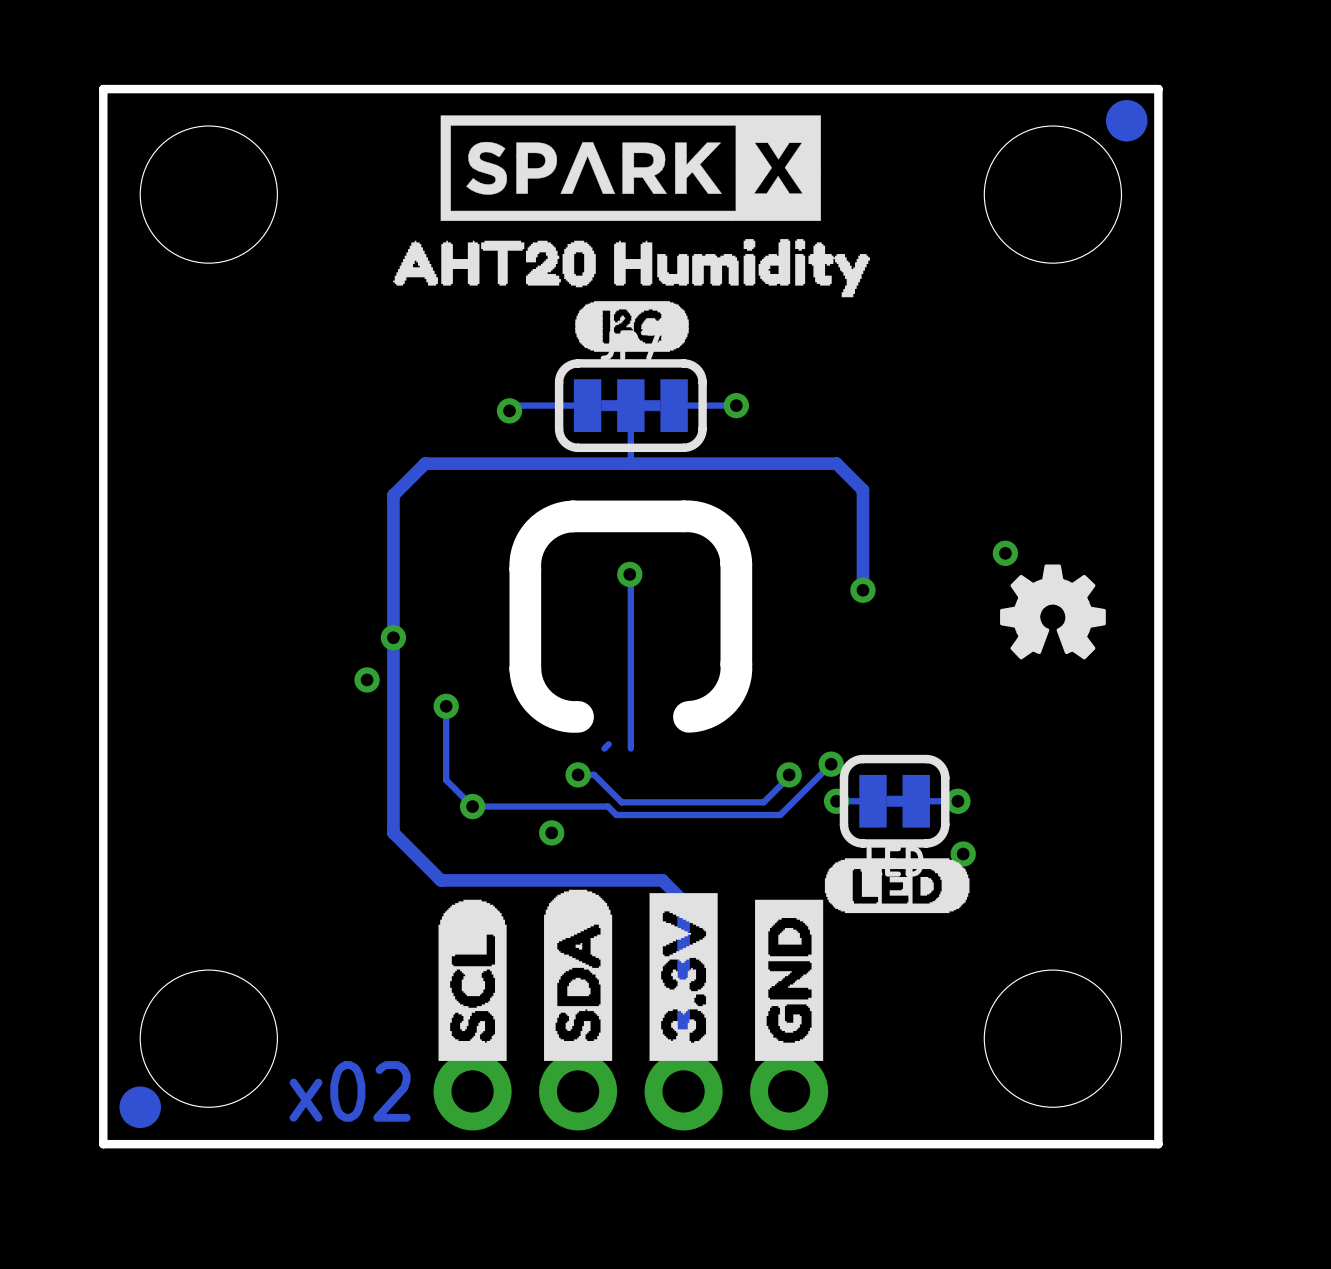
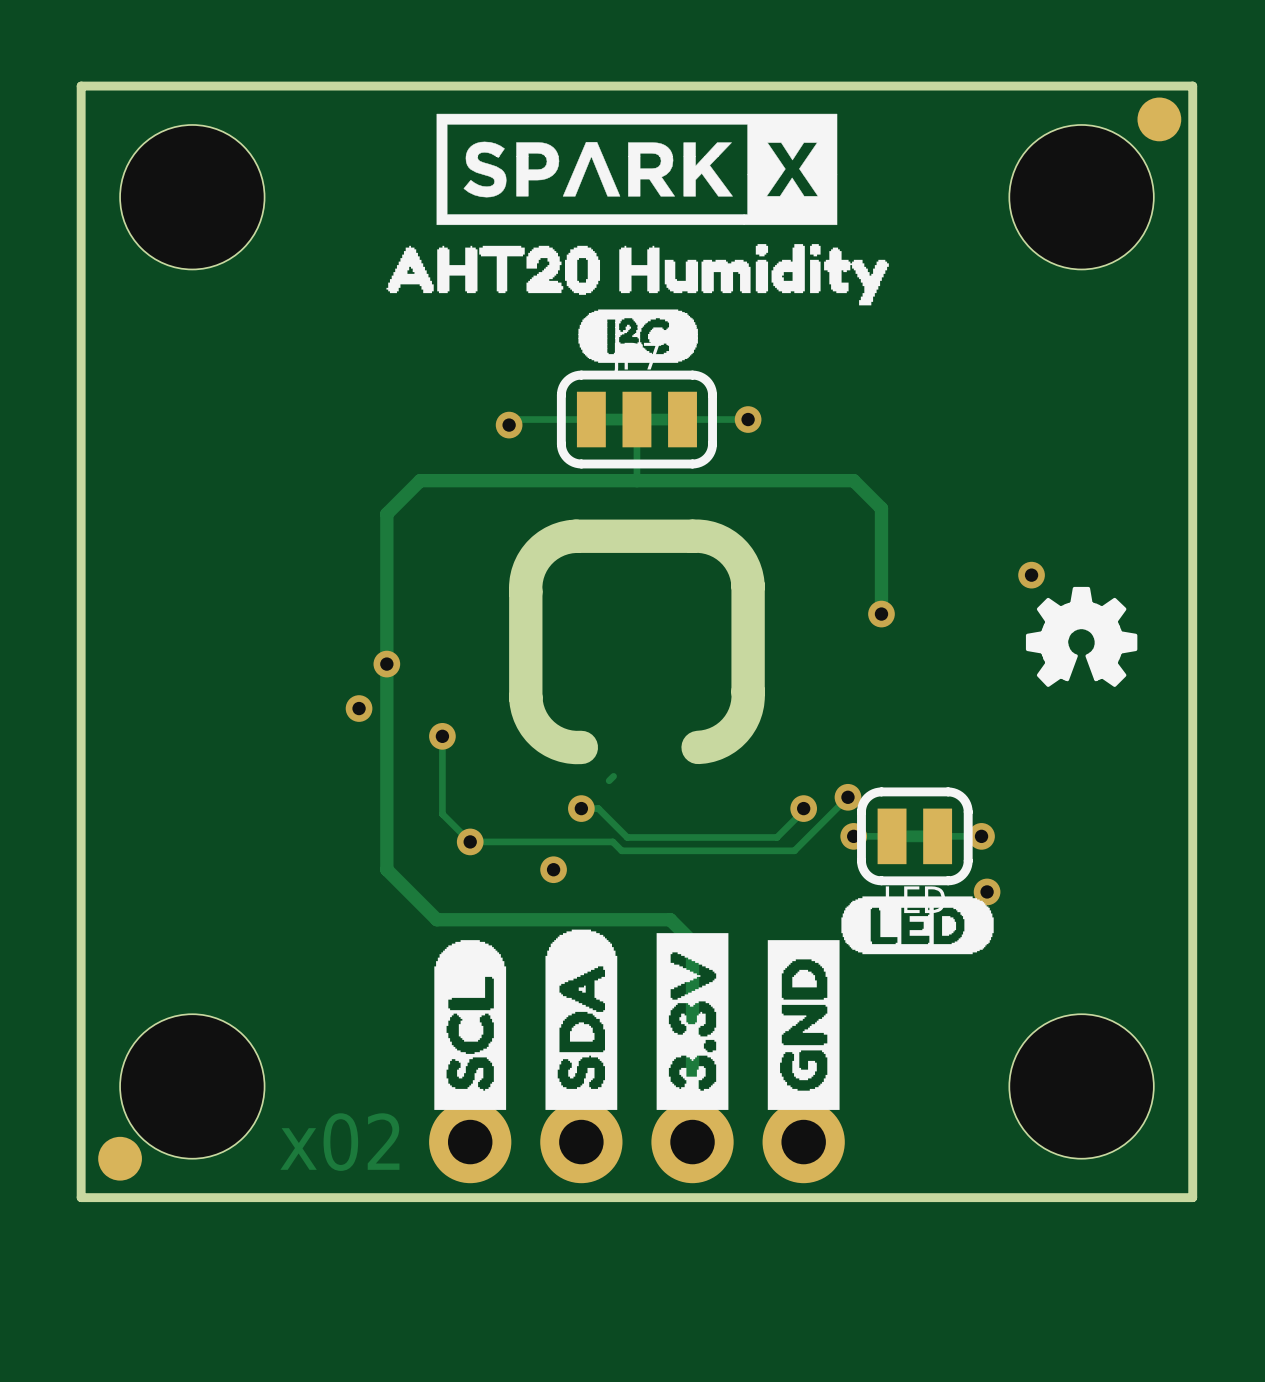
track: (629, 574) (630, 748) -> none
via: (629, 574) -> none

